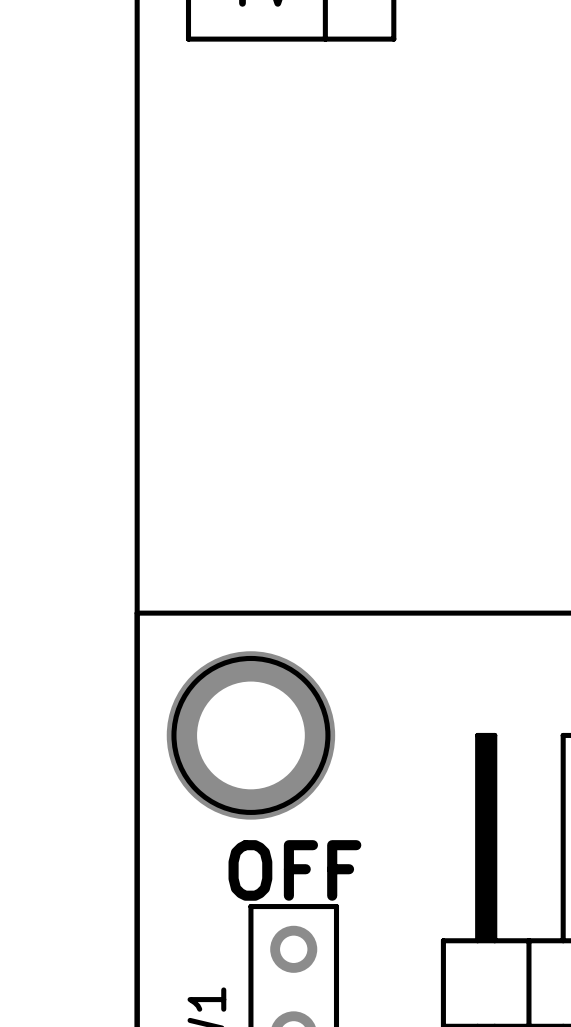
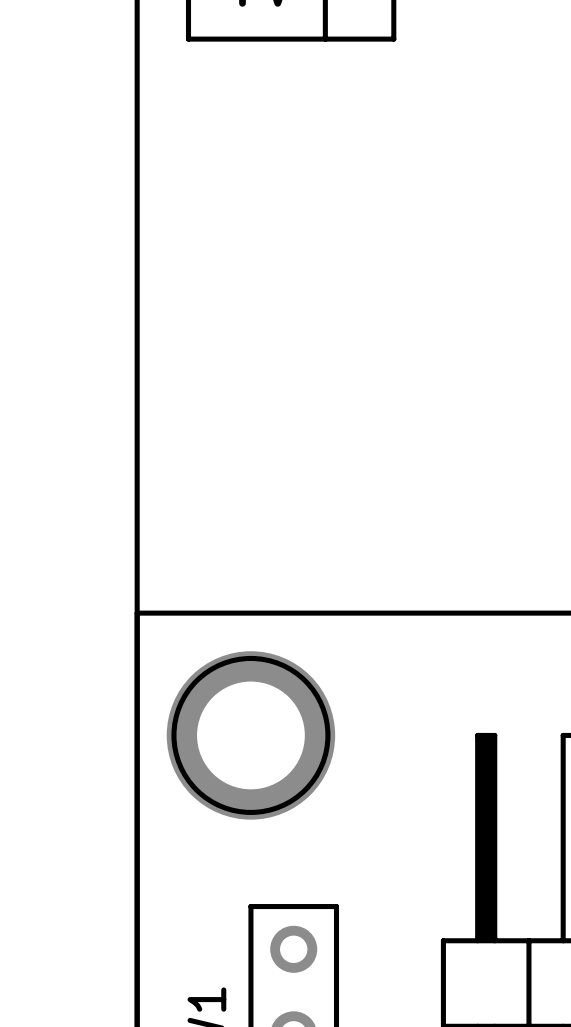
text: OFF (294, 870) -> none

